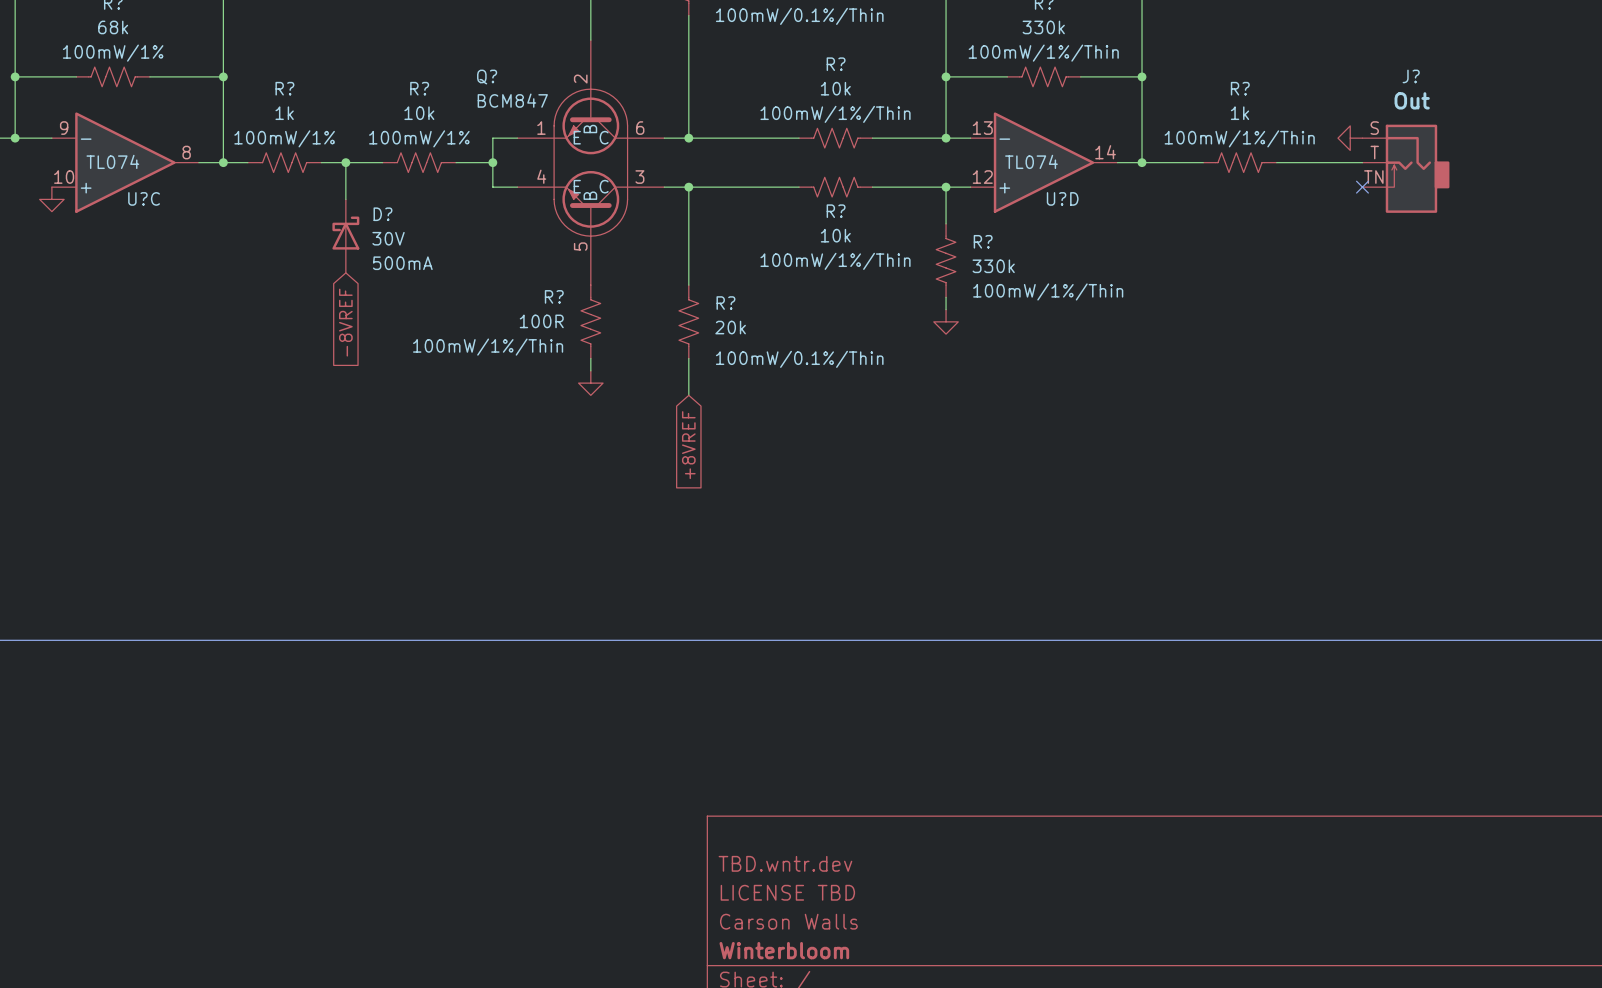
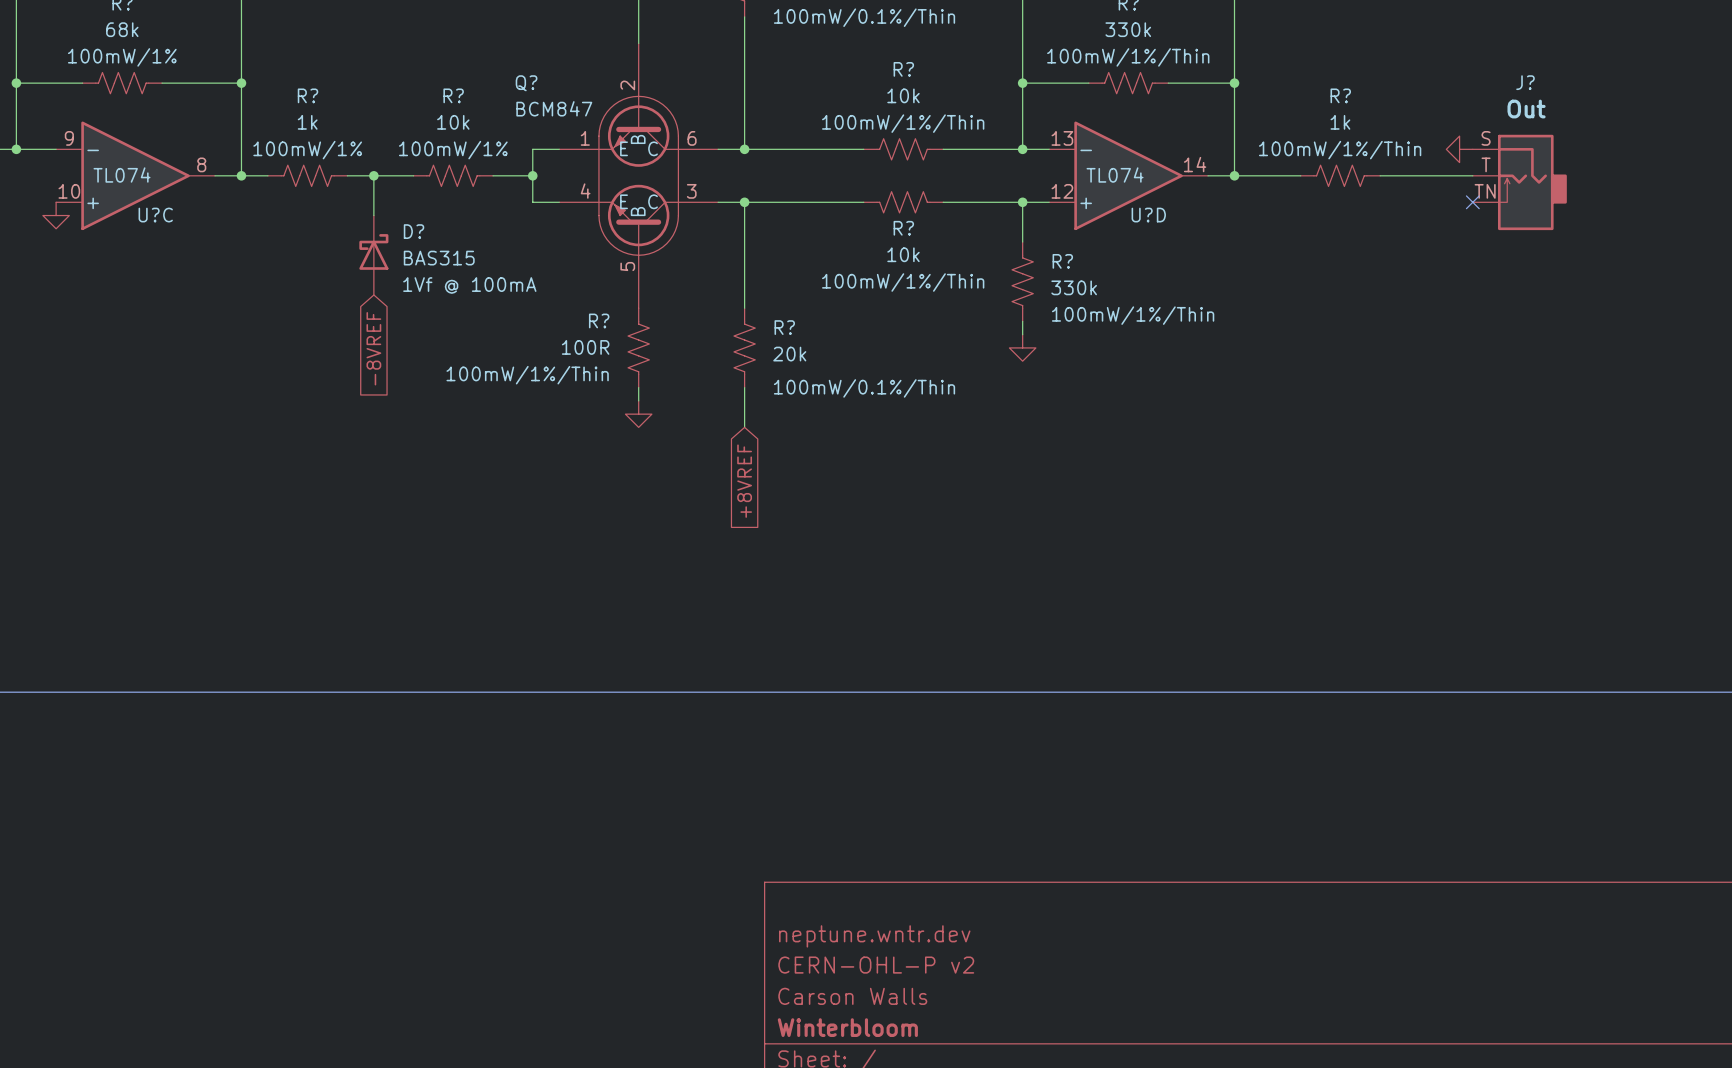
D? value: 30V (388, 238) -> BAS315 (439, 258)
D? text: 500mA (402, 263) -> 1Vf @ 100mA (469, 285)
title block: TBD.wntr.dev (785, 863) -> neptune.wntr.dev (874, 936)
title block: LICENSE TBD (787, 892) -> CERN-OHL-P v2 (876, 965)

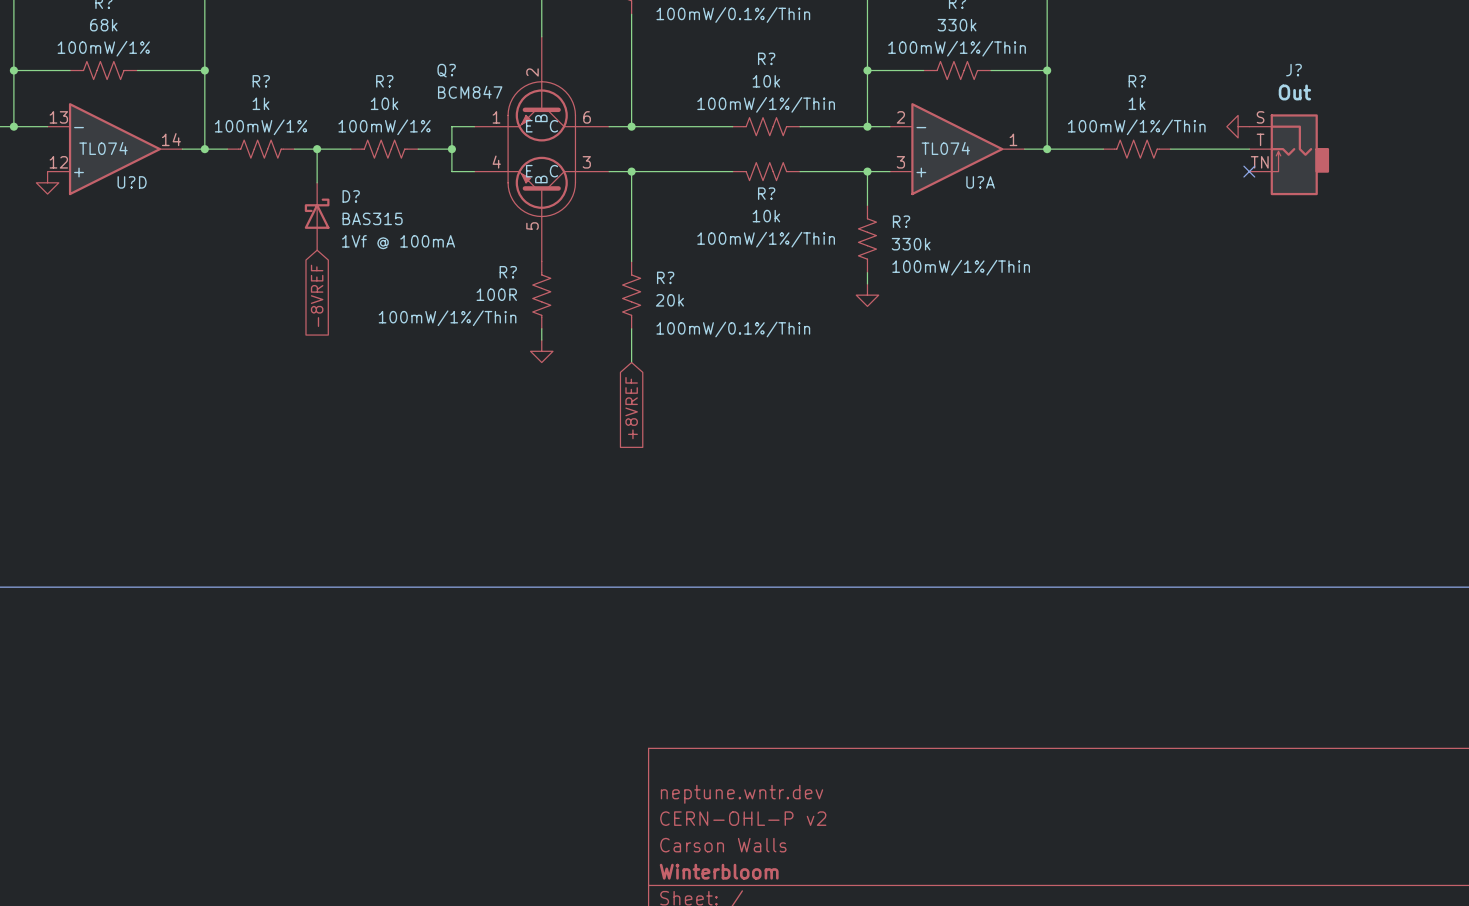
U?C pin number: 9 (69, 138) -> 13 (58, 117)
U?D pin number: 13 (1062, 138) -> 2 (900, 117)
U?C pin number: 8 (201, 164) -> 14 (171, 139)
U?D pin number: 14 (1195, 164) -> 1 (1013, 139)
U?C pin number: 10 (69, 191) -> 12 (58, 162)
U?D pin number: 12 (1062, 191) -> 3 (900, 162)
U?C name: U?C (155, 215) -> U?D (132, 182)
U?D name: U?D (1148, 215) -> U?A (980, 182)

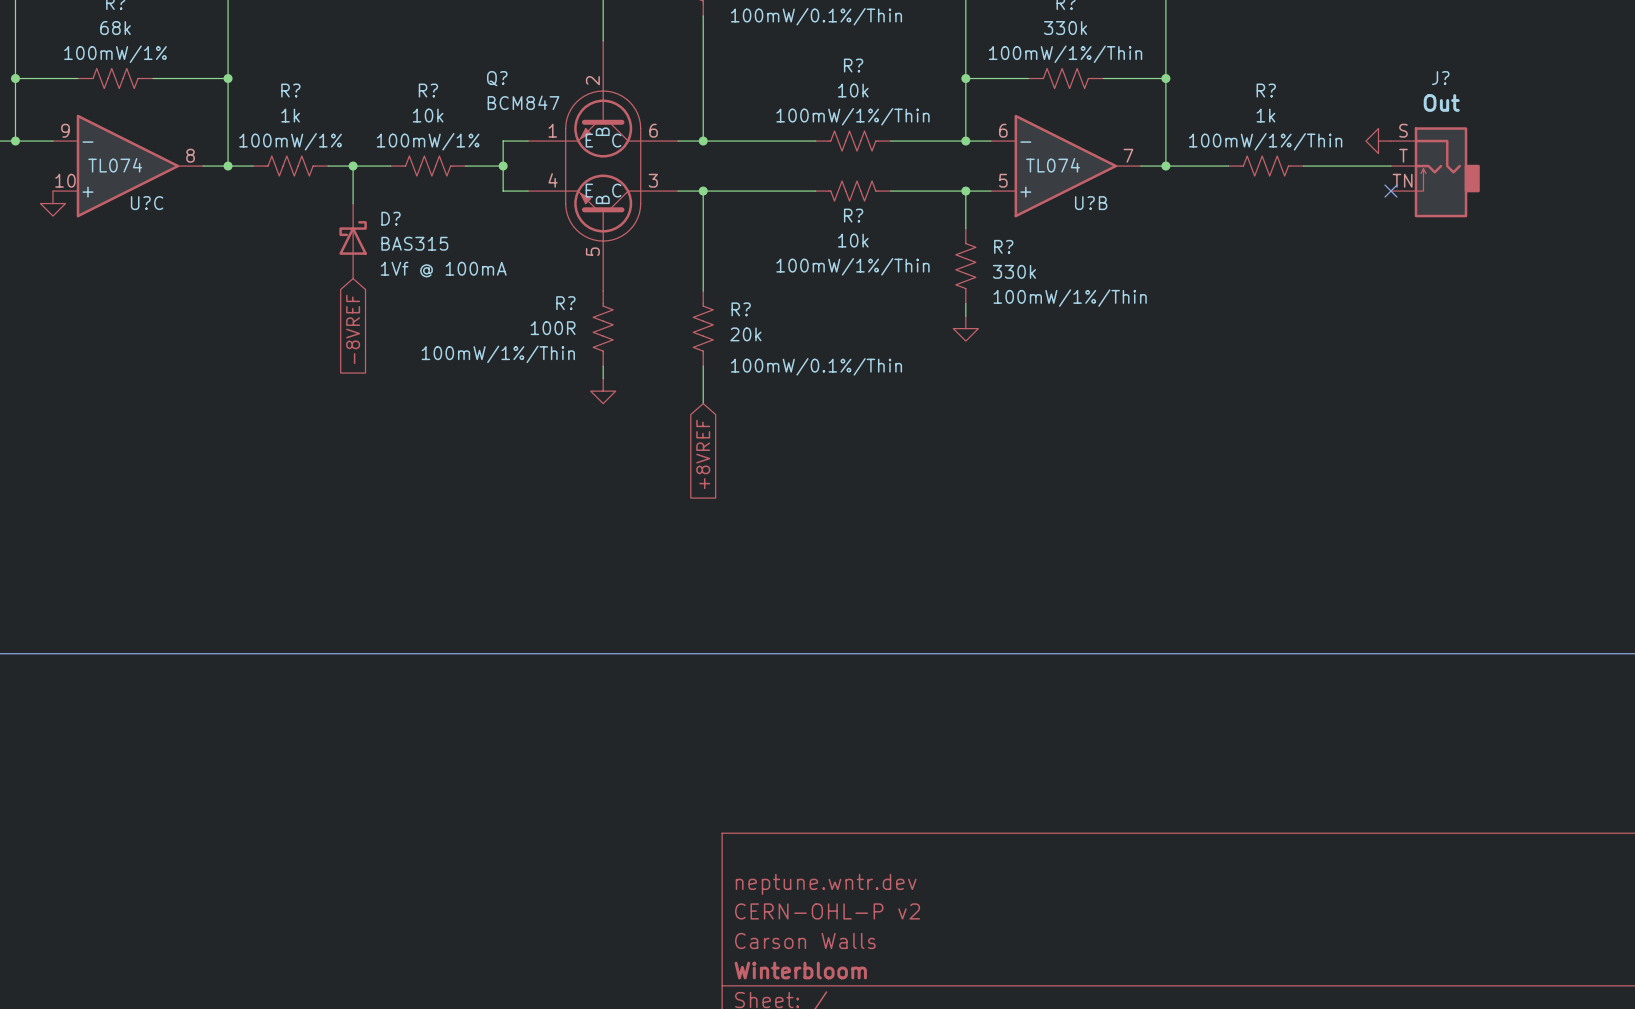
U?D pin number: 13 (58, 117) -> 9 (65, 130)
U?A pin number: 2 (900, 117) -> 6 (1003, 130)
U?D pin number: 14 (171, 139) -> 8 (190, 155)
U?A pin number: 1 (1013, 139) -> 7 (1128, 155)
U?D pin number: 12 (58, 162) -> 10 (65, 180)
U?A pin number: 3 (900, 162) -> 5 (1003, 180)
U?D name: U?D (132, 182) -> U?C (147, 203)
U?A name: U?A (980, 182) -> U?B (1091, 203)

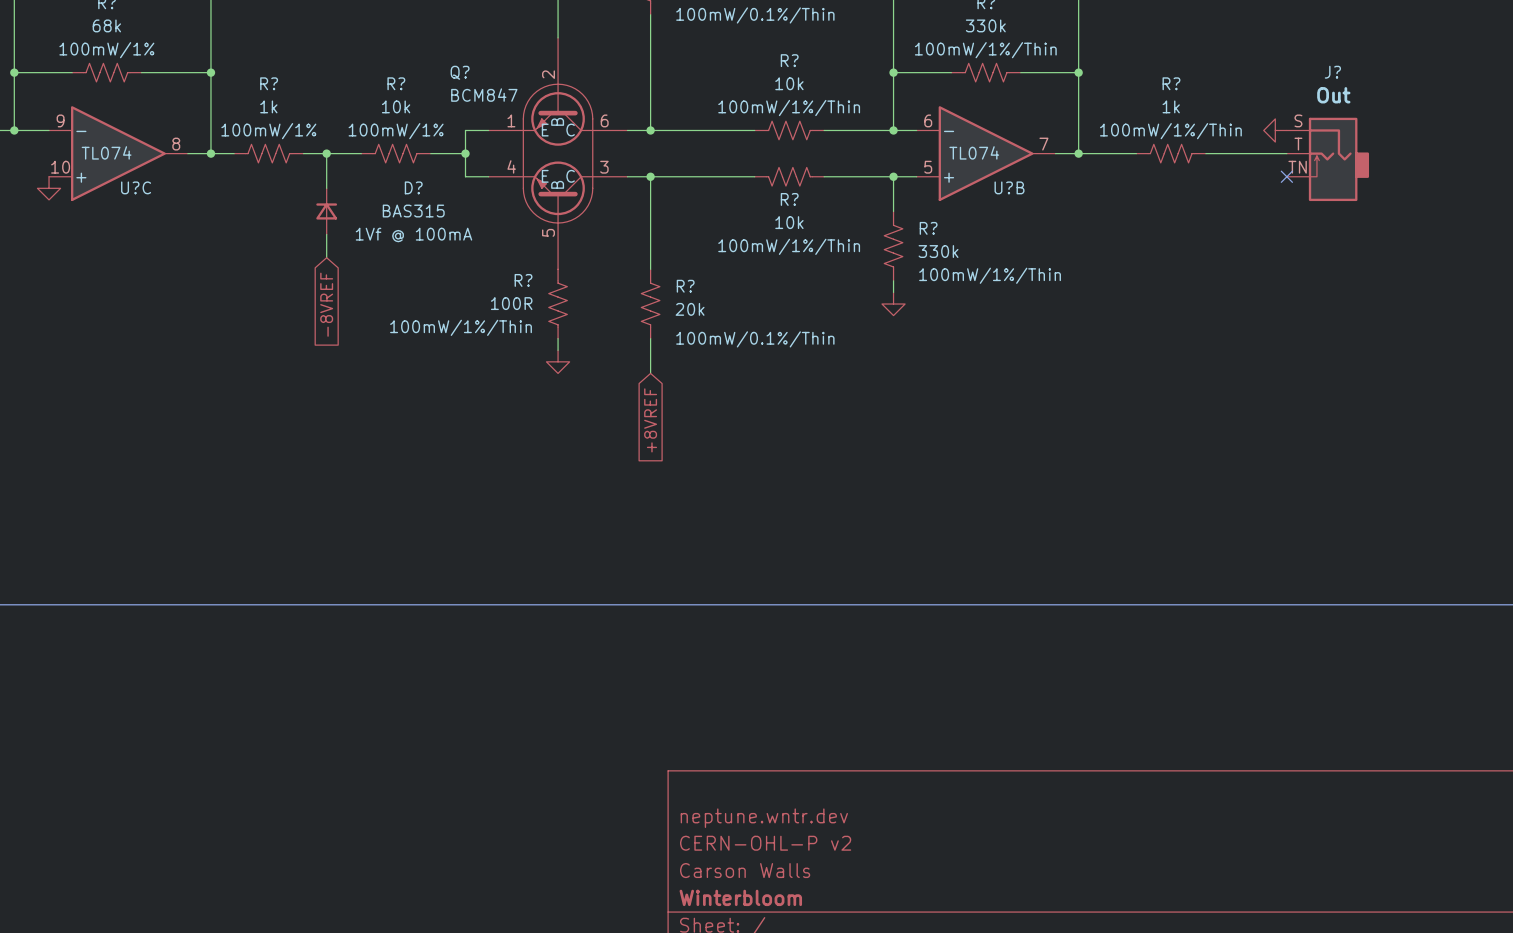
D?: none -> BAS315 (326, 211)
D?: BAS315 (353, 241) -> none

